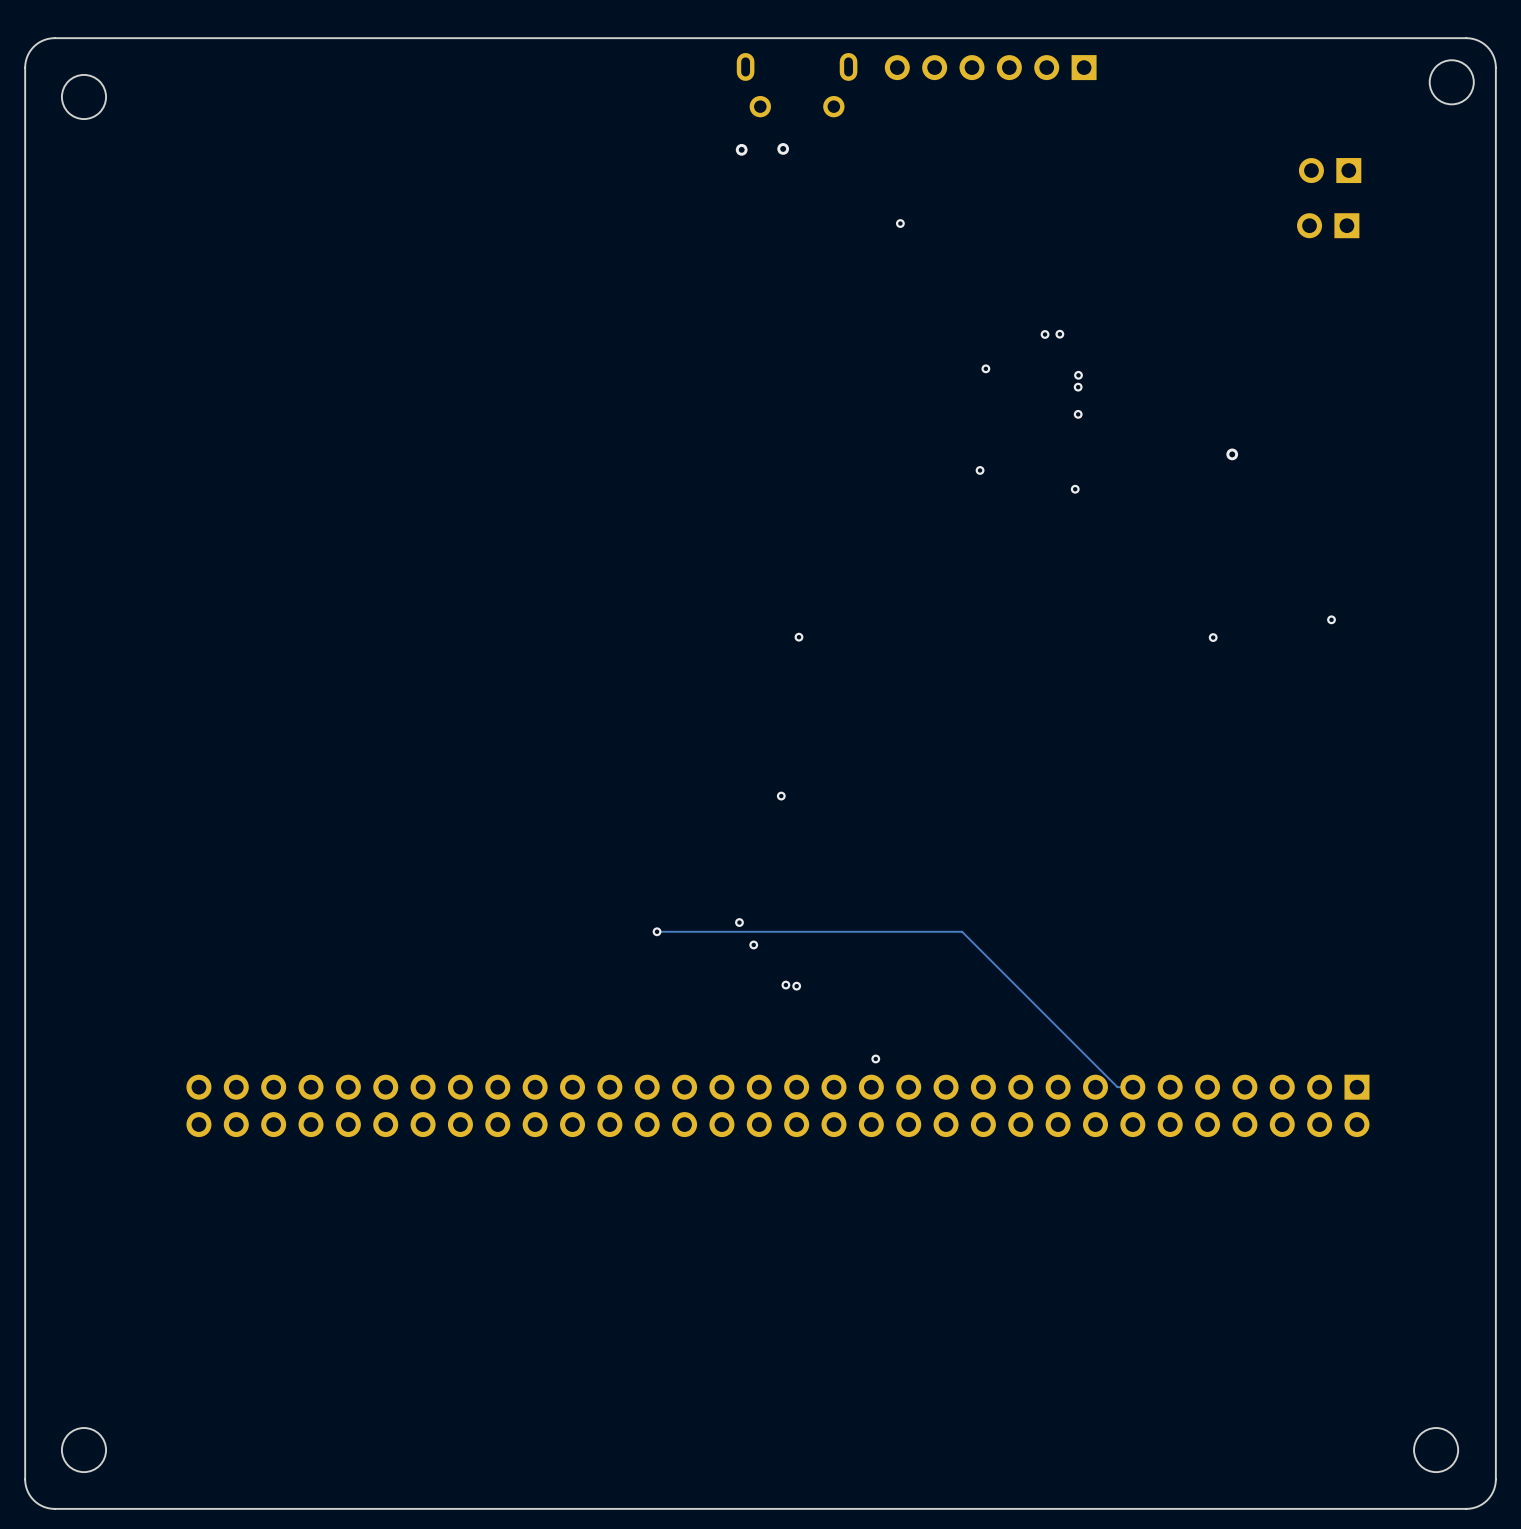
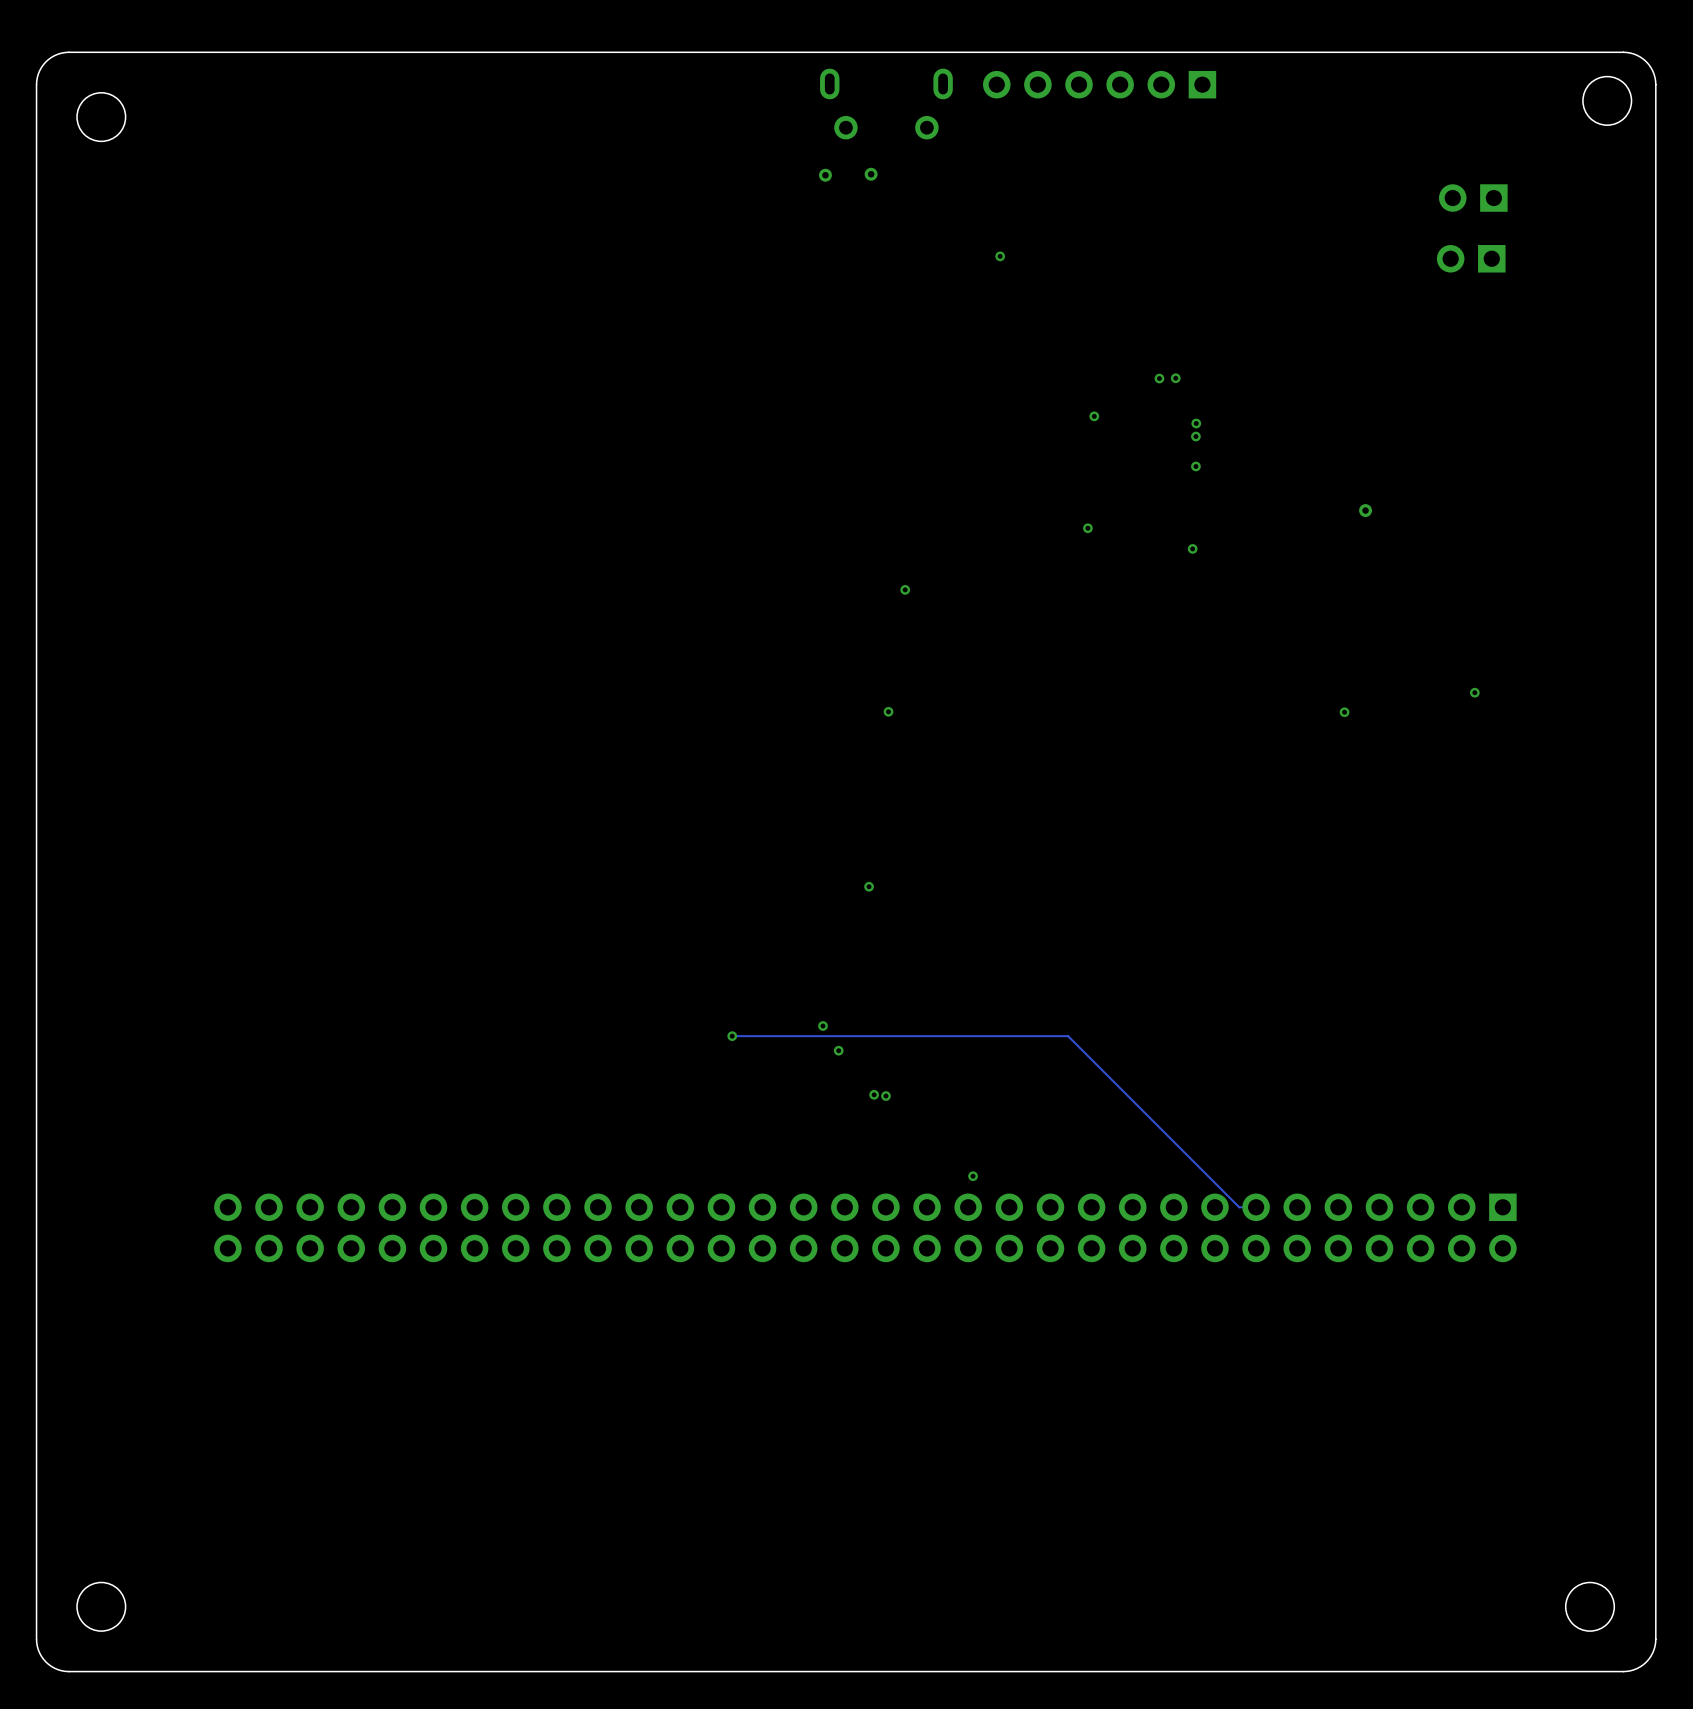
via: none -> (905, 589)

